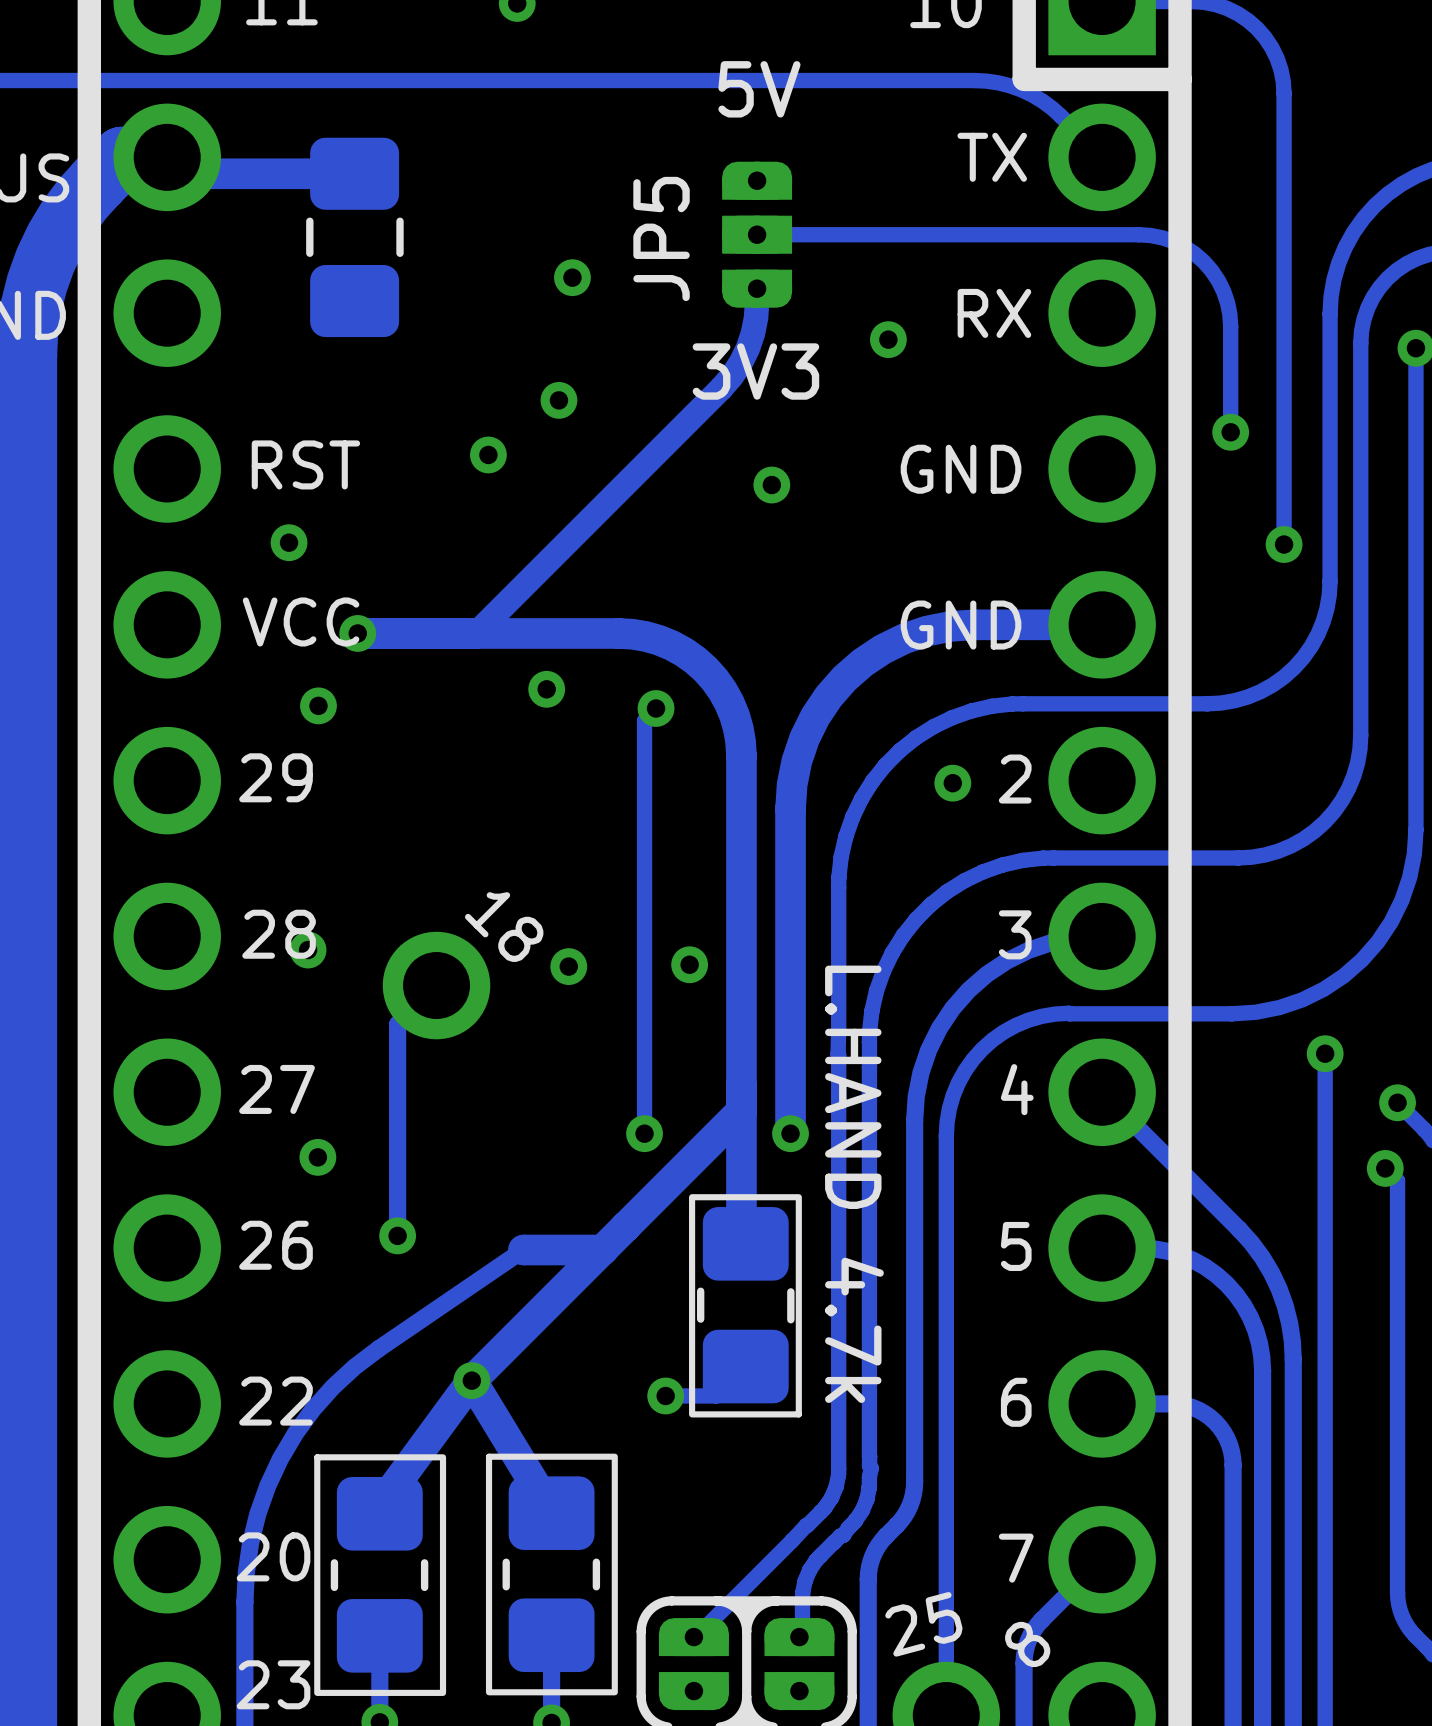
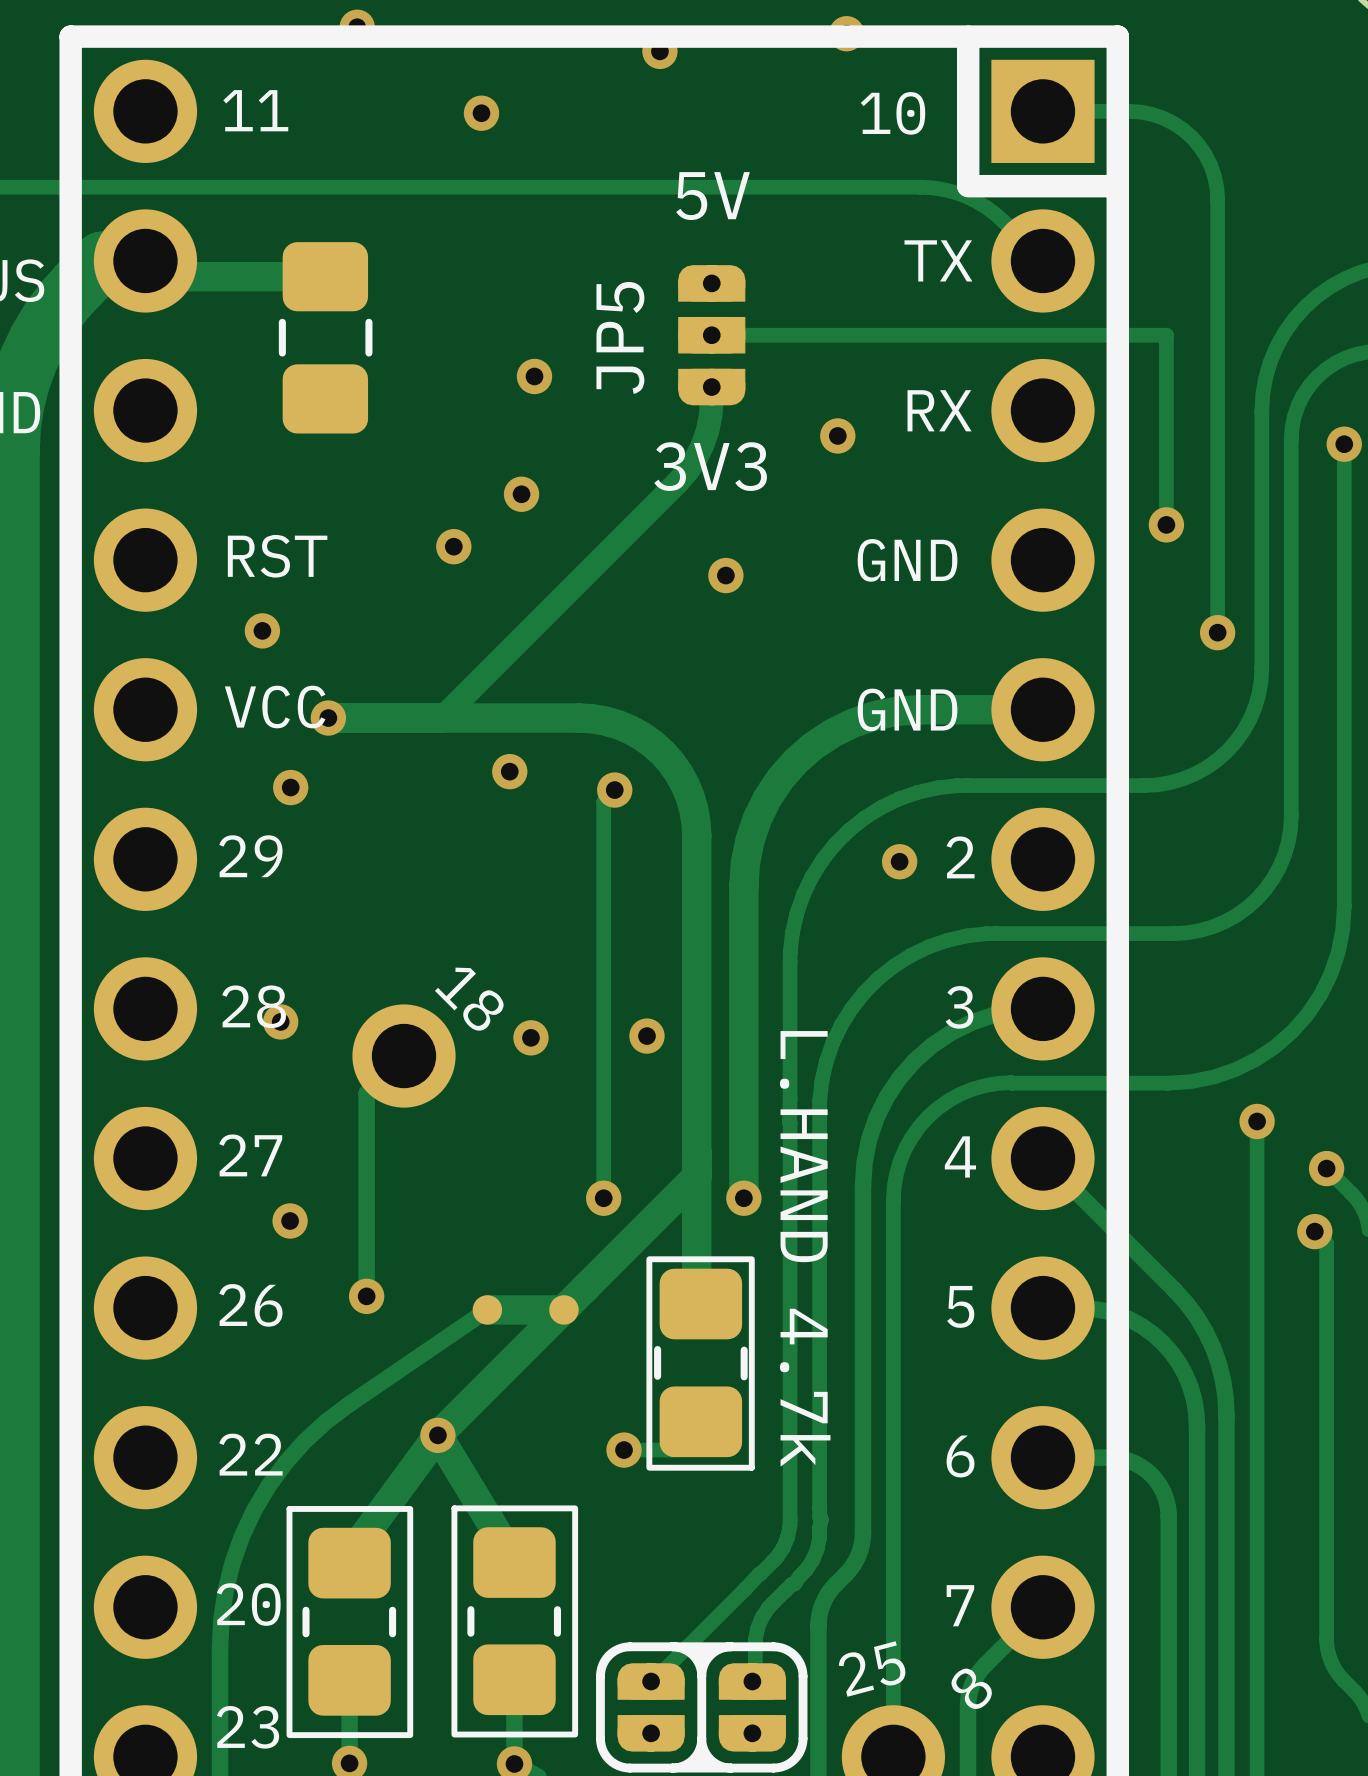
track: (1138, 234) (1150, 235) (1173, 241) (1184, 247) (1203, 261) (1218, 280) (1223, 291) (1229, 314) (1230, 326) -> (1078, 335) (1166, 335) (1166, 423)

